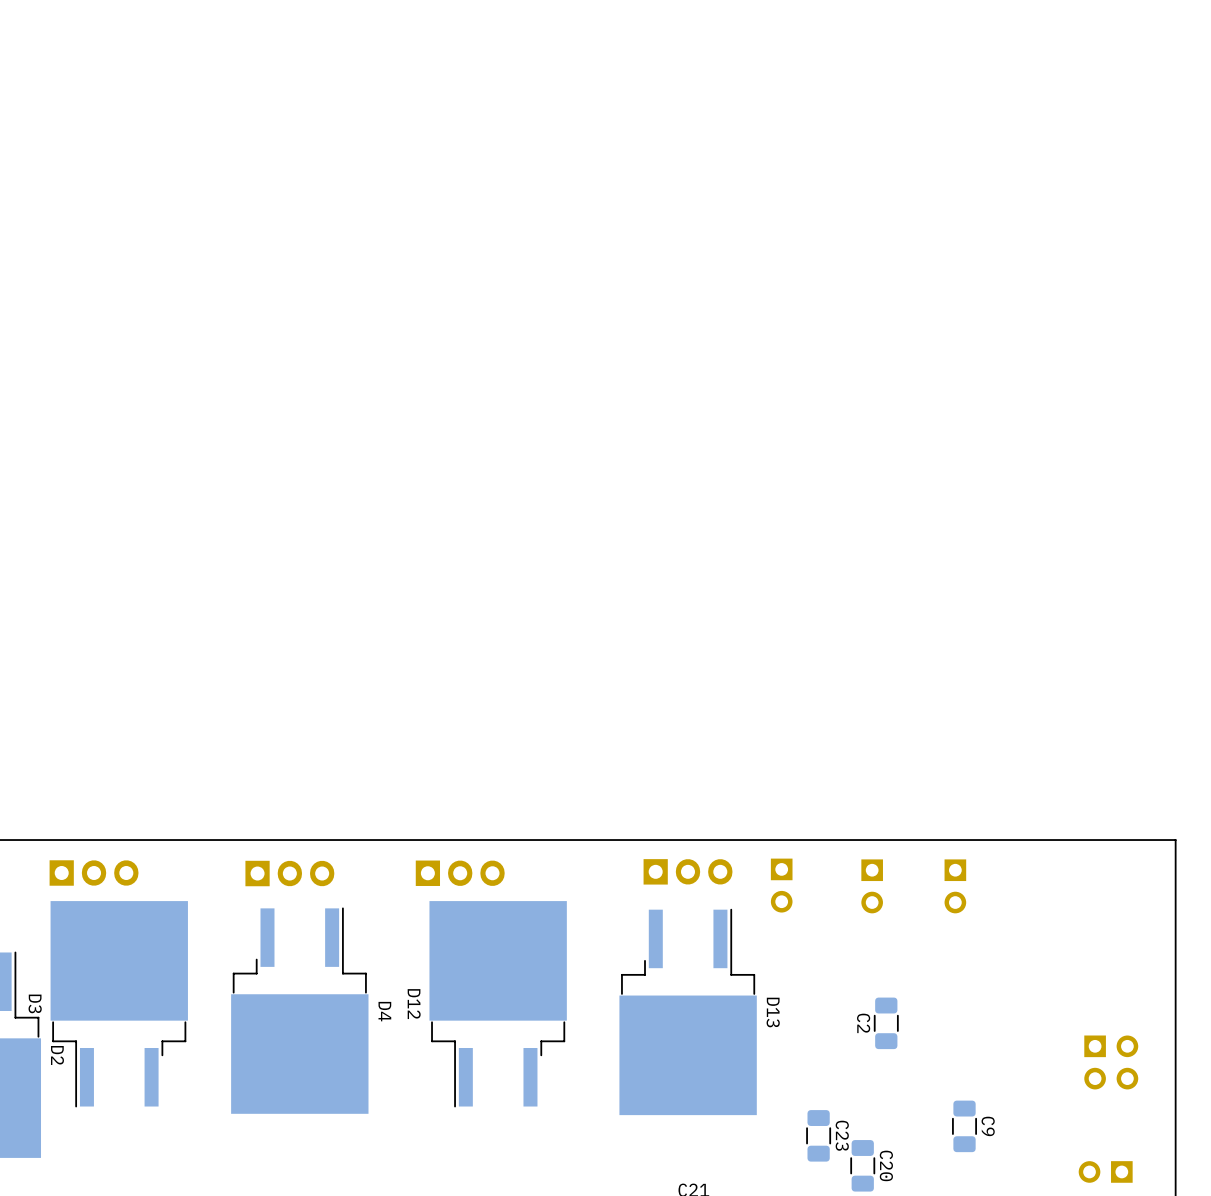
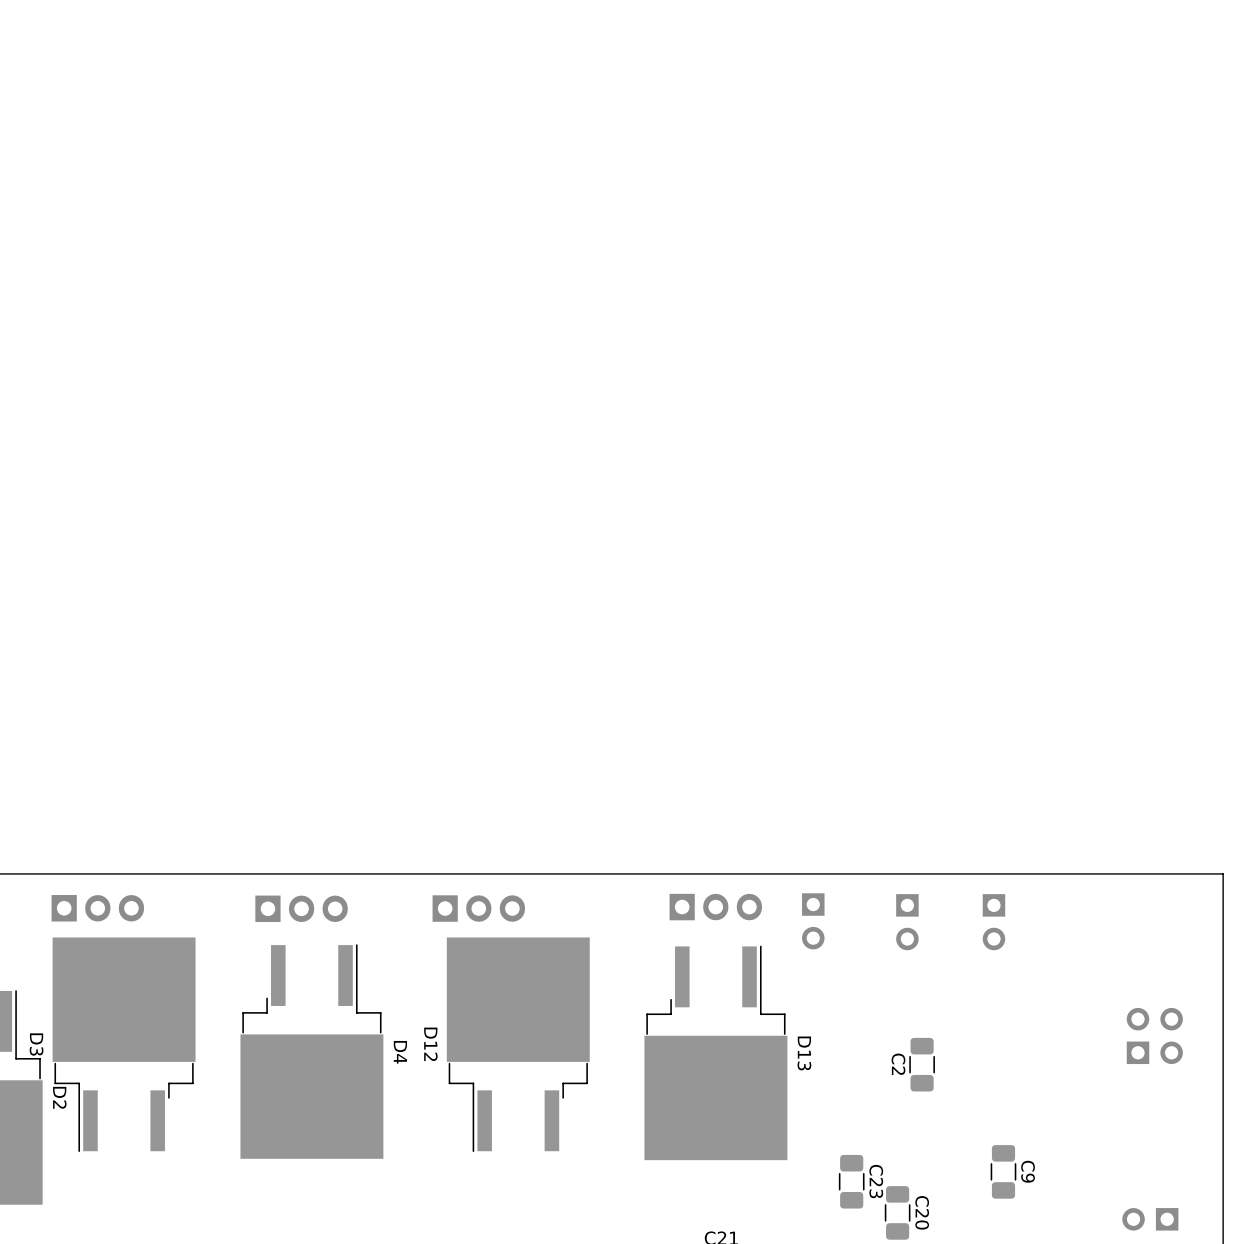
part rotation: 0° (1111, 1062) -> 90° counterclockwise (1154, 1035)
part position: (1111, 1062) -> (1154, 1035)

